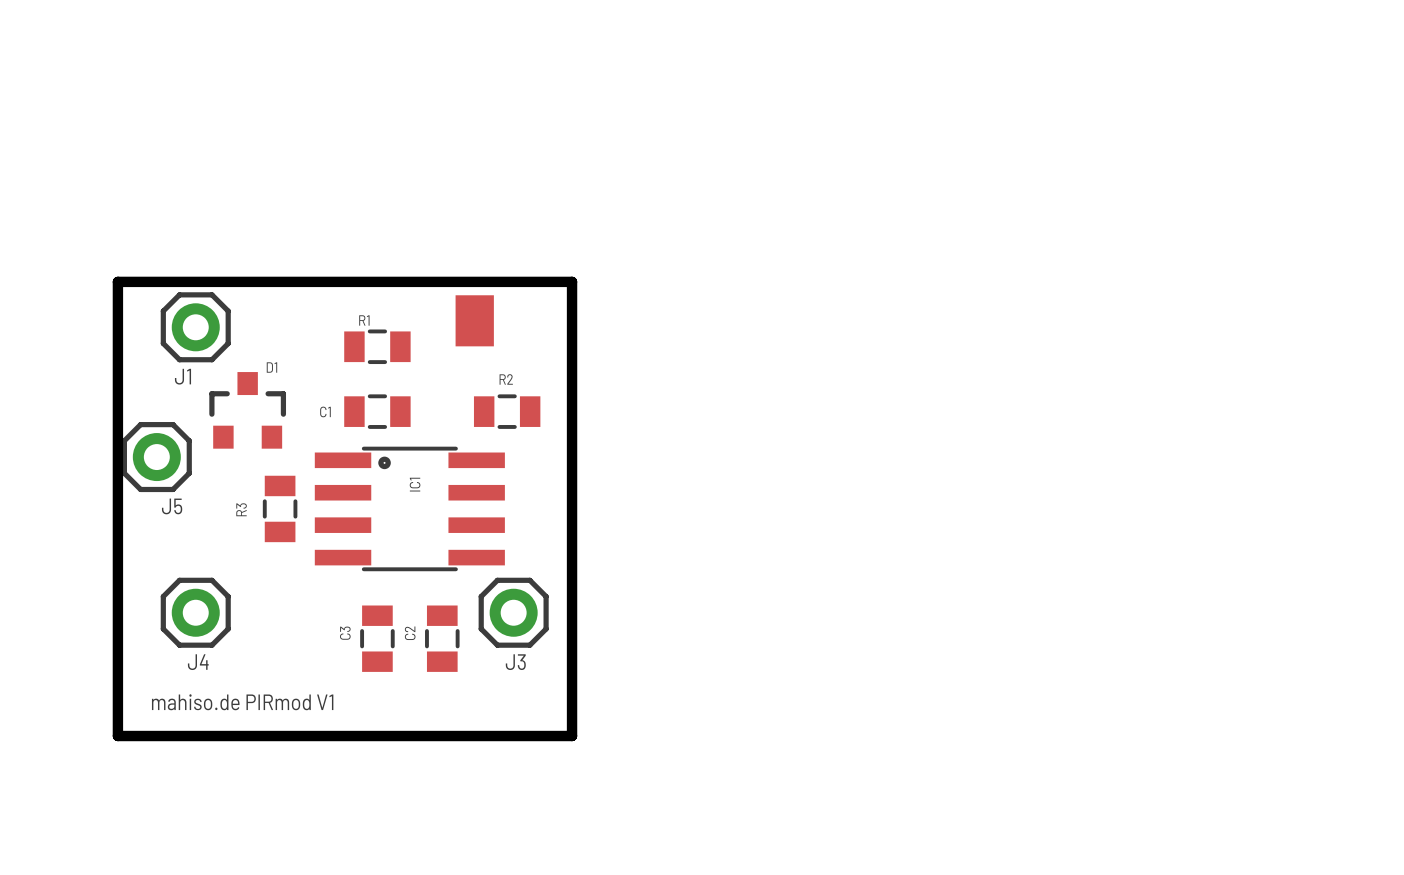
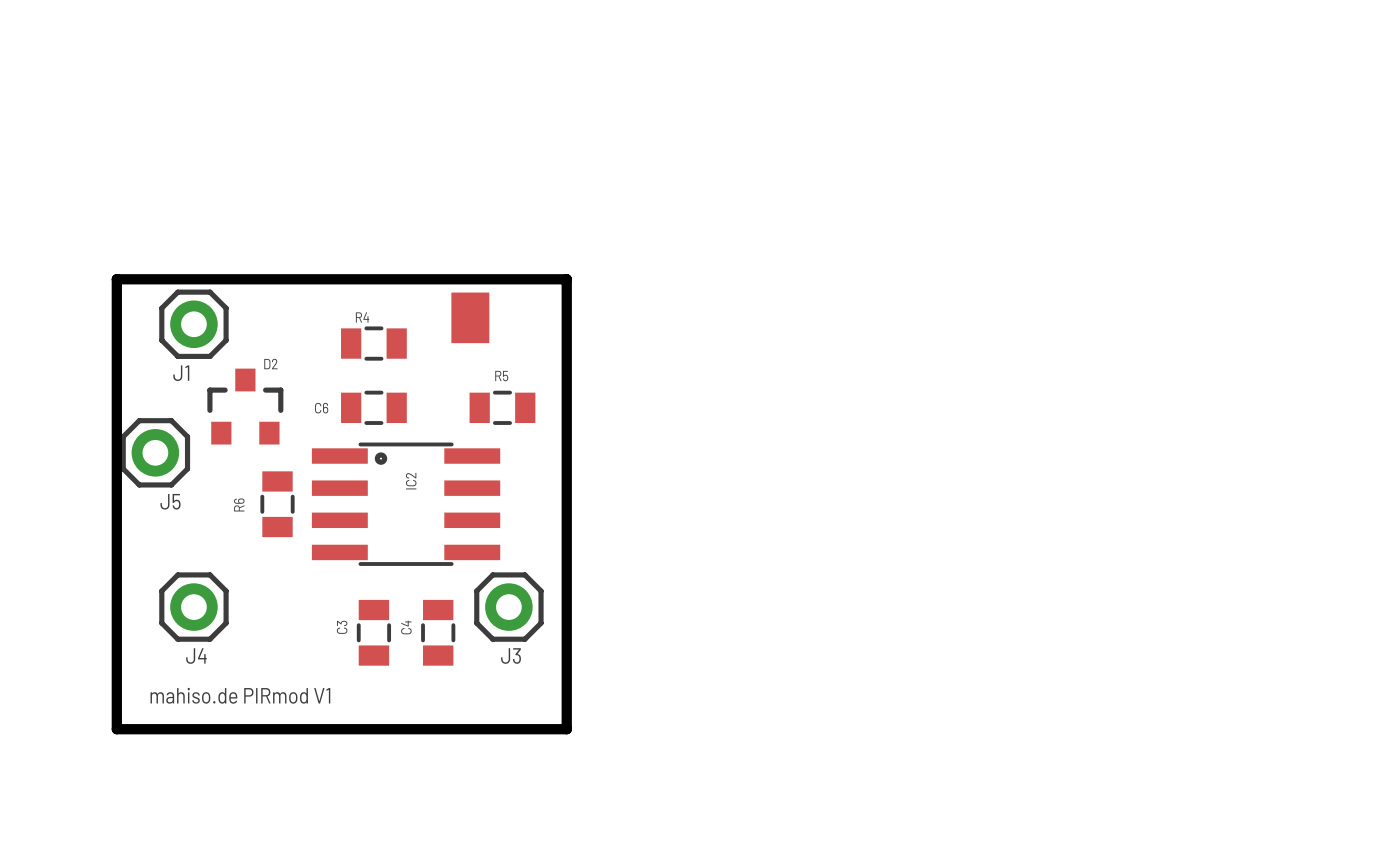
R1 name: R1 (364, 320) -> R4 (362, 317)
D1 name: D1 (271, 367) -> D2 (270, 364)
R2 name: R2 (506, 379) -> R5 (501, 376)
C1 name: C1 (325, 411) -> C6 (321, 408)
IC1 name: IC1 (415, 484) -> IC2 (411, 481)
R3 name: R3 (241, 509) -> R6 (239, 504)
C2 name: C2 (410, 633) -> C4 (406, 627)

